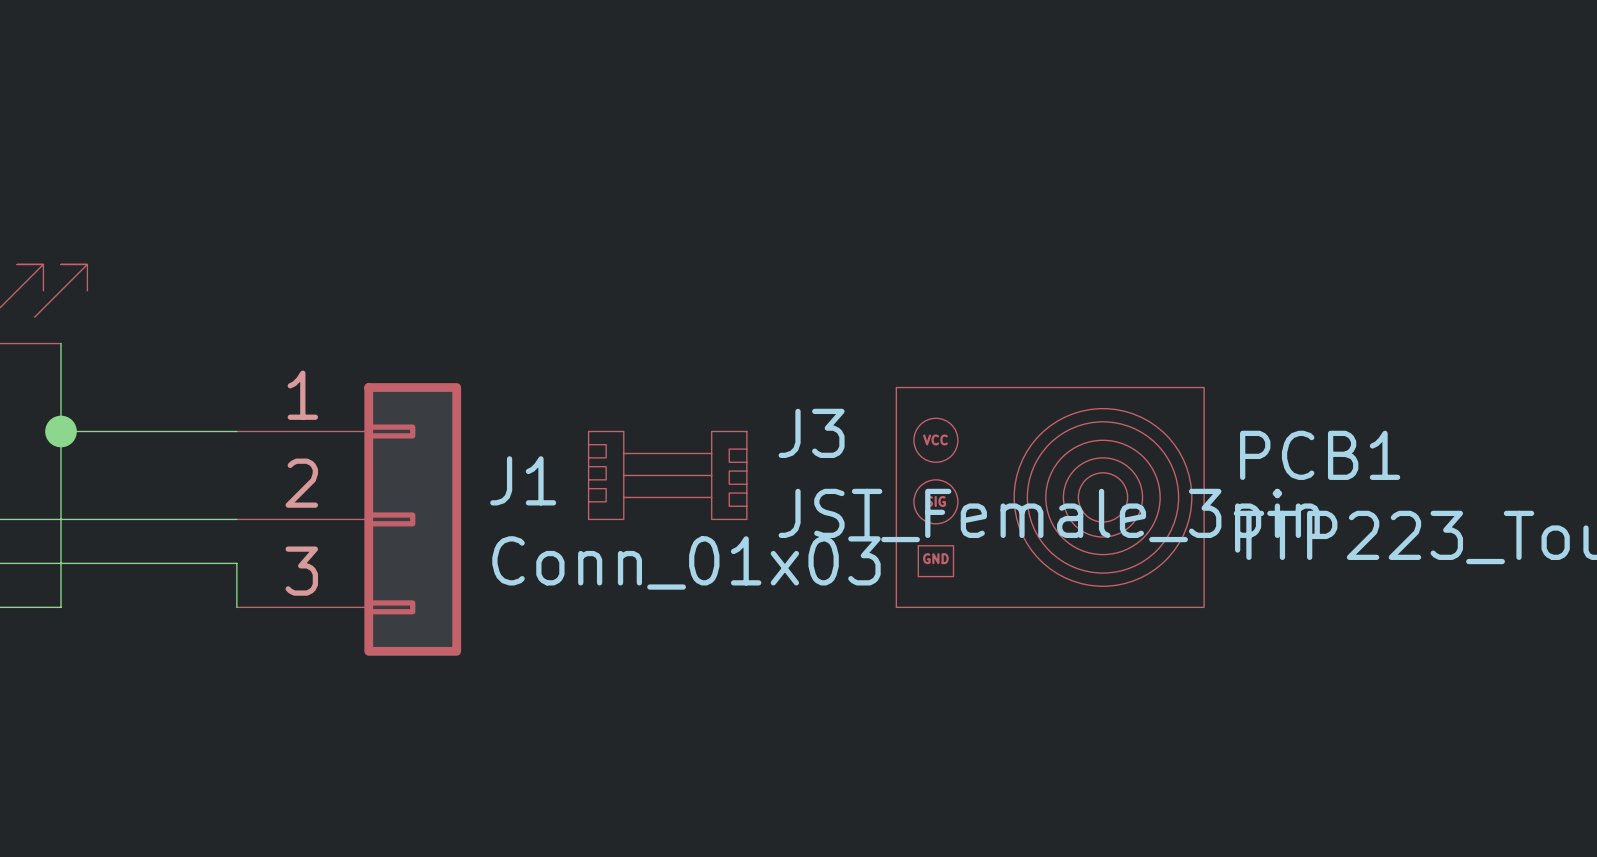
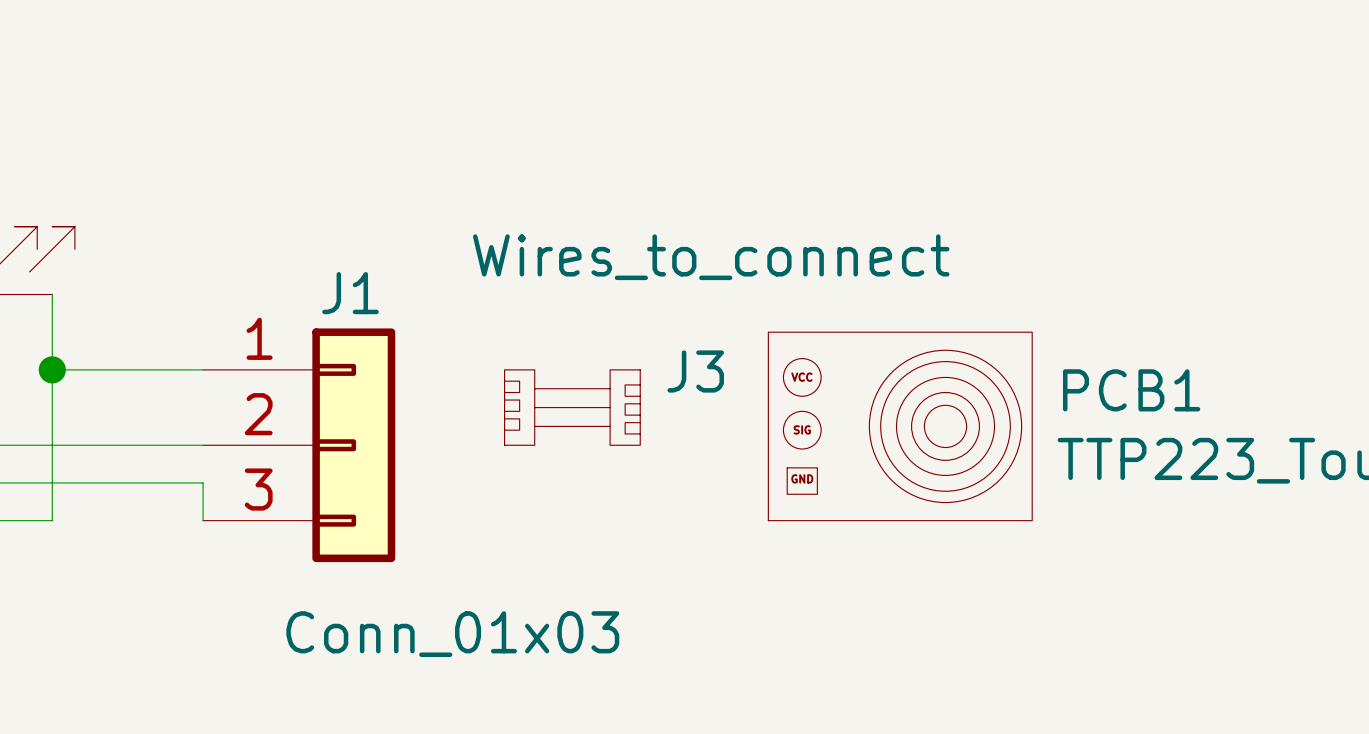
J1 name position: J1 (523, 480) -> J1 (350, 293)
J3 value: JST_Female_3pin (1049, 520) -> Wires_to_connect (711, 257)
J1 value position: Conn_01x03 (686, 562) -> Conn_01x03 (452, 634)

